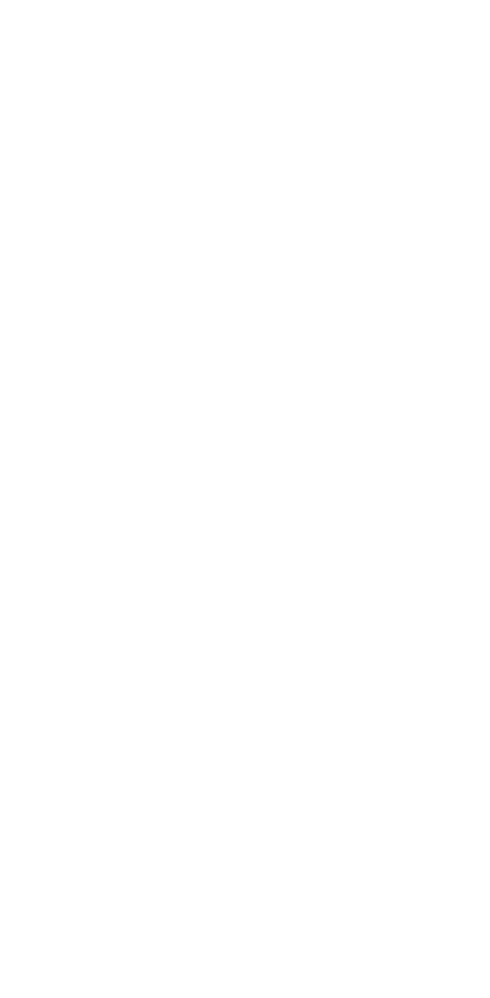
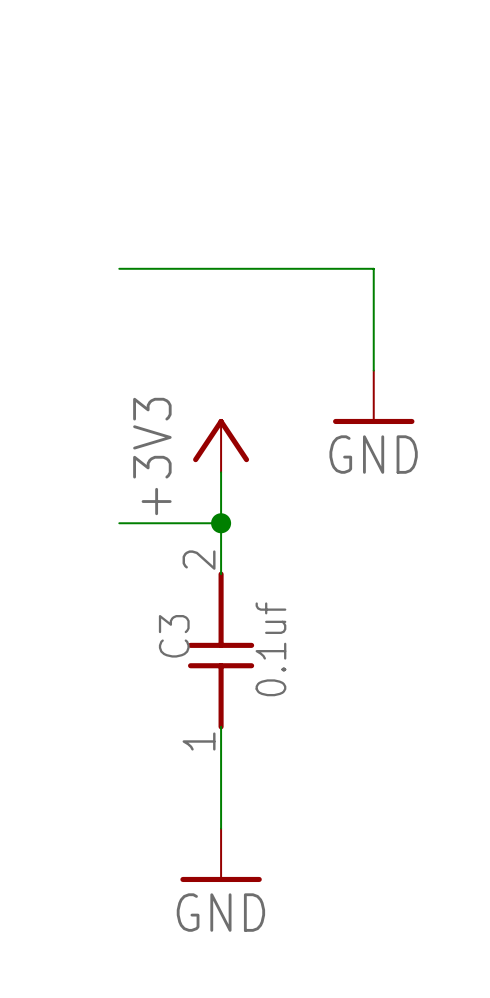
wire: none -> (119, 268) (373, 268) (373, 370)
power symbol: none -> GND (373, 397)
power symbol: none -> +3V3 (221, 445)
wire: none -> (221, 472) (221, 574)
wire: none -> (119, 523) (221, 523)
junction: none -> (221, 523)
C3: none -> 0.1uf (221, 650)
wire: none -> (221, 726) (221, 828)
power symbol: none -> GND (221, 855)

